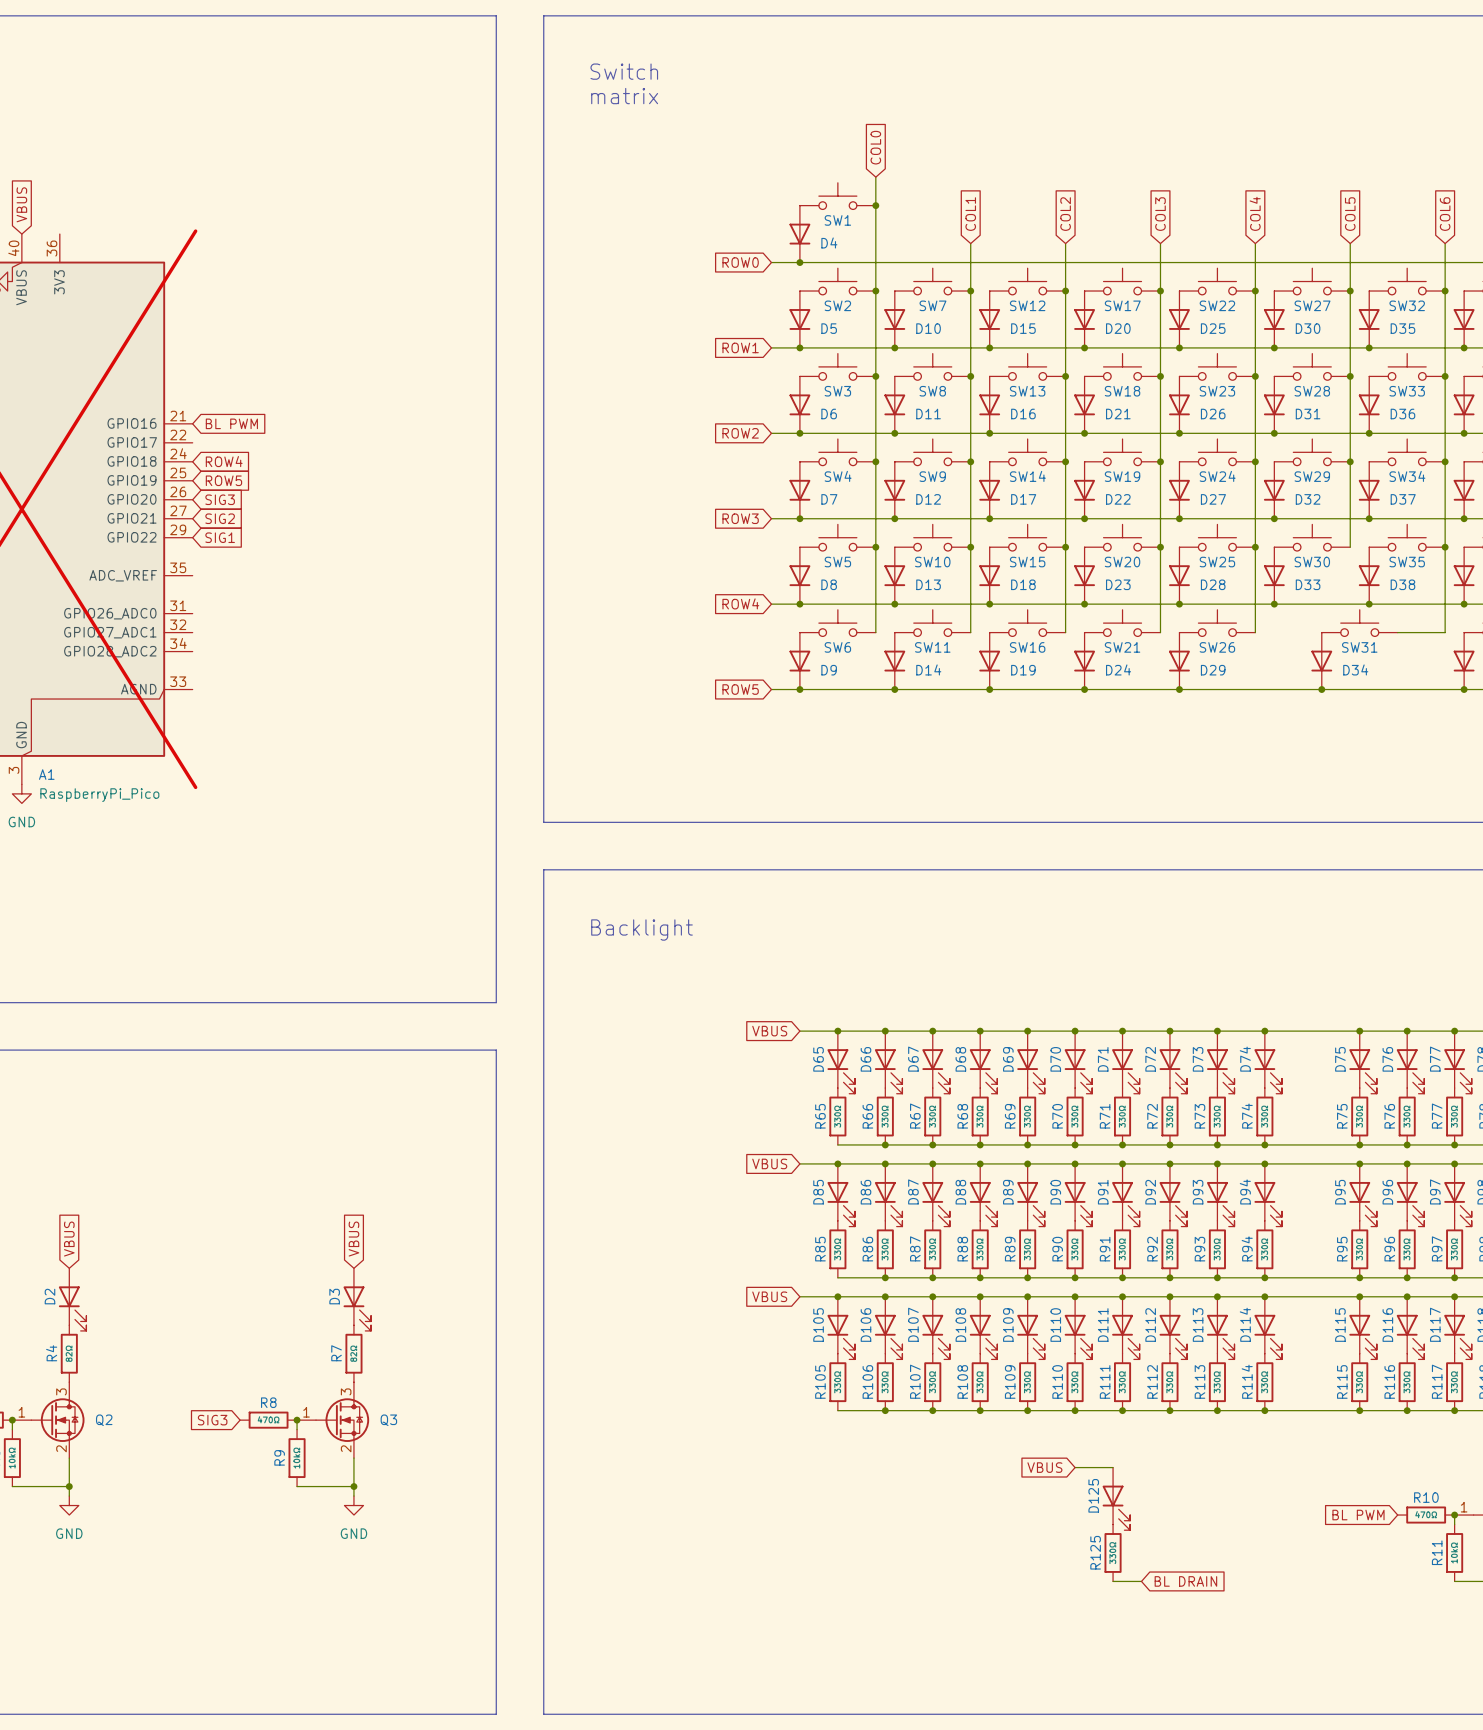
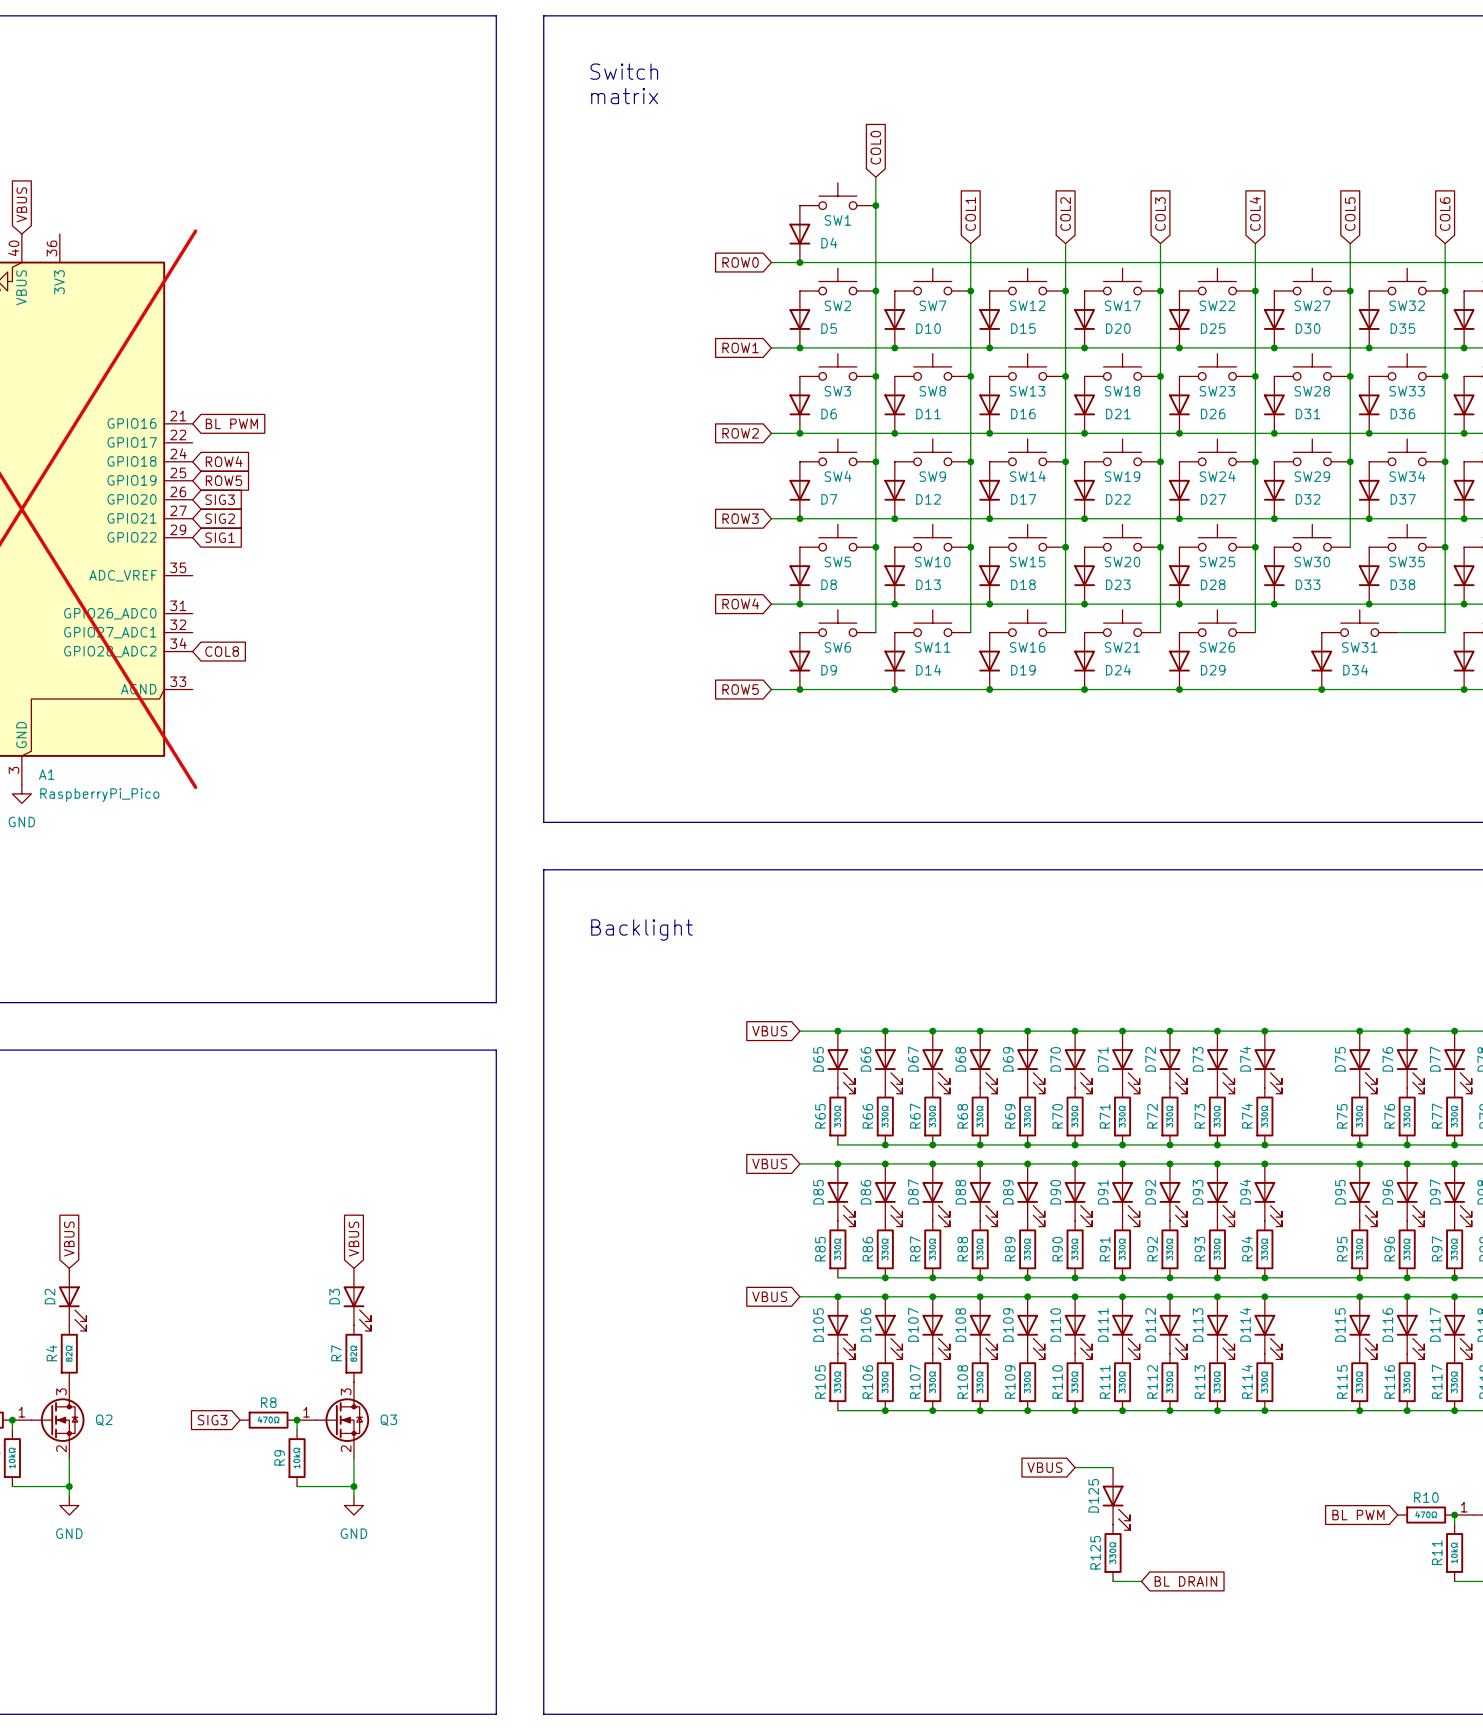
global label: none -> COL8 (222, 651)

